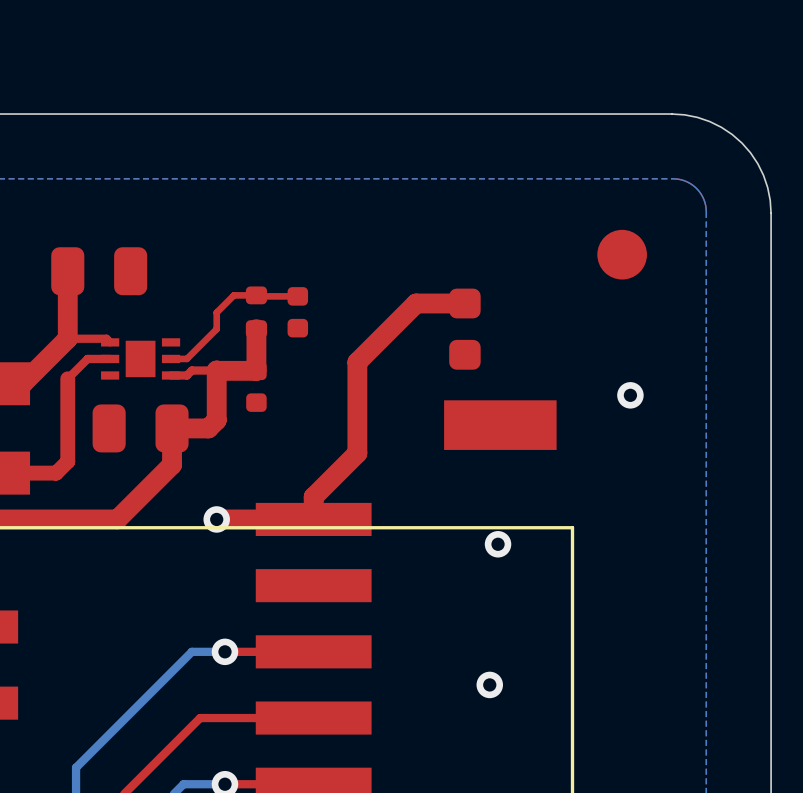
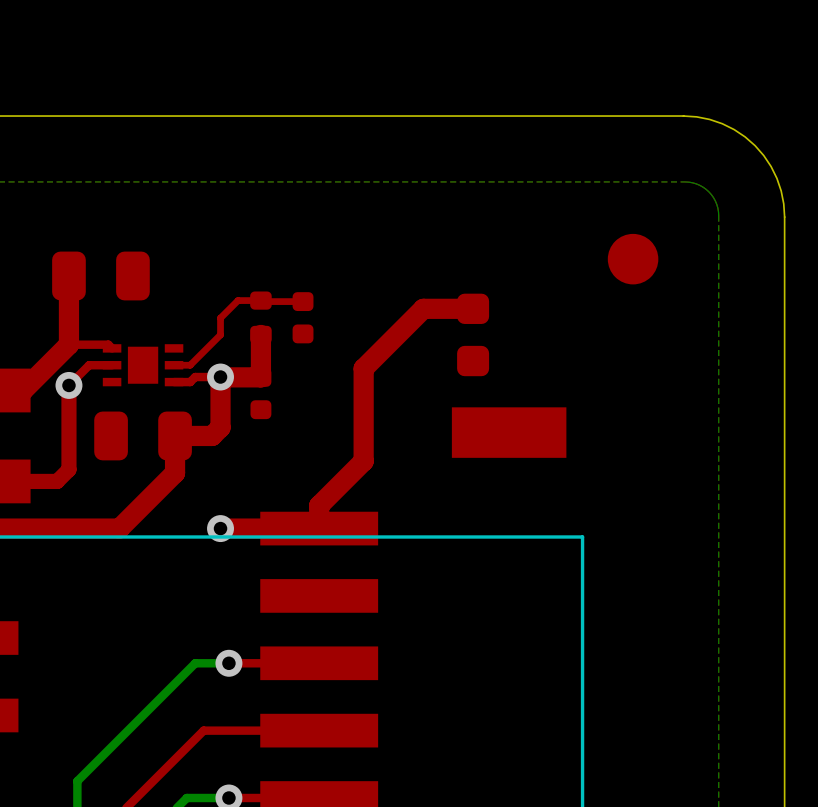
via: none -> (220, 377)
via: none -> (68, 385)
via: (630, 395) -> none
via: (498, 544) -> none
via: (489, 684) -> none

